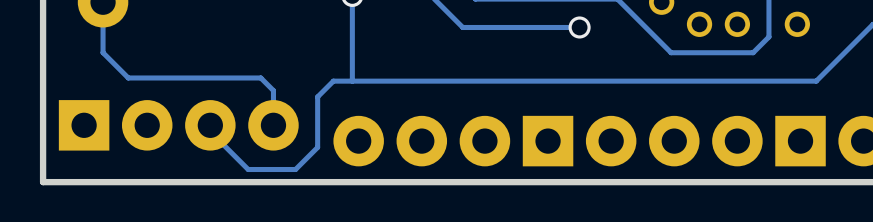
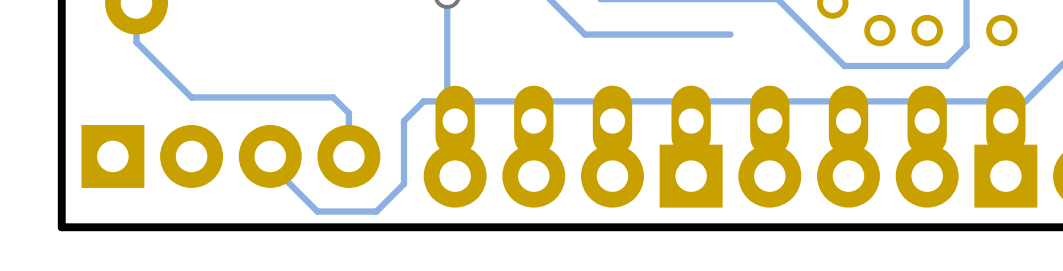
via: (579, 27) -> none
track: (103, 33) (103, 52) (128, 77) (147, 77) -> (136, 42) (191, 97)
part footprint: [333, 115, 574, 167] -> [423, 85, 723, 208]
part footprint: [585, 115, 826, 167] -> [738, 85, 1038, 208]

